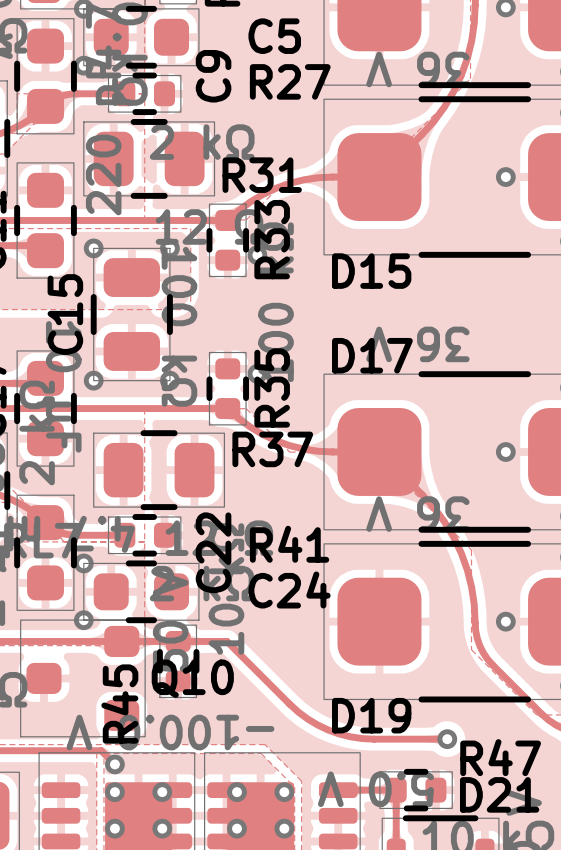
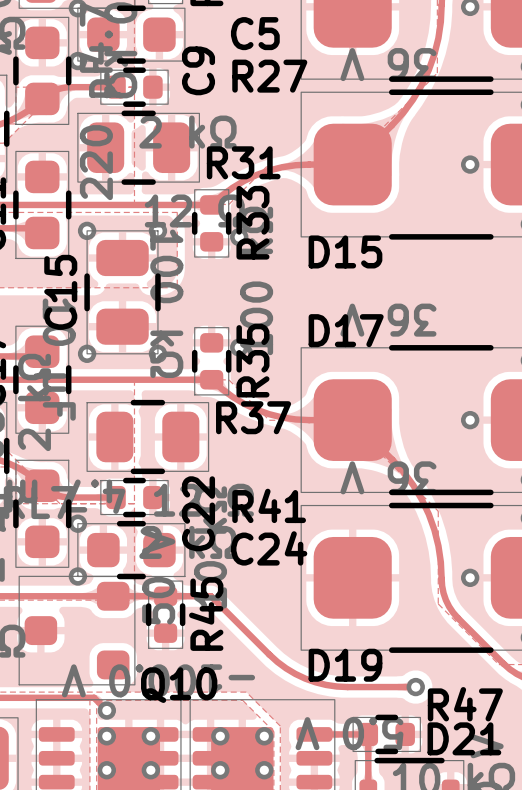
Q10 name position: Q10 (192, 678) -> Q10 (179, 685)
R45 name position: R45 (119, 704) -> R45 (206, 614)

